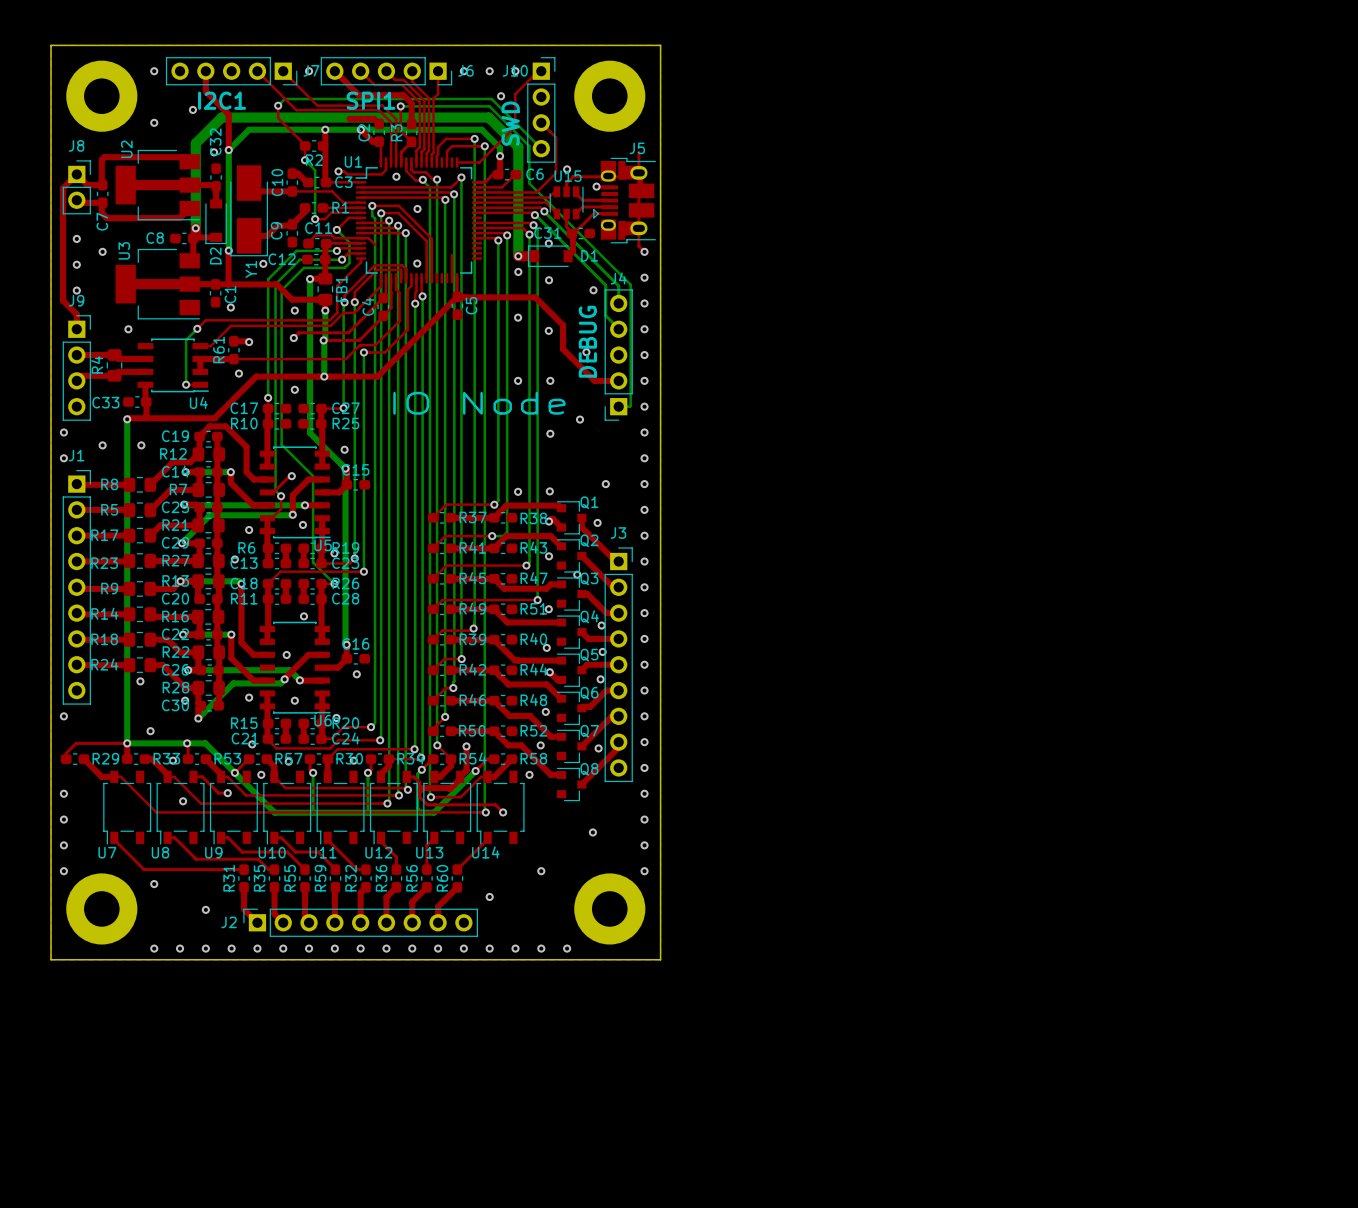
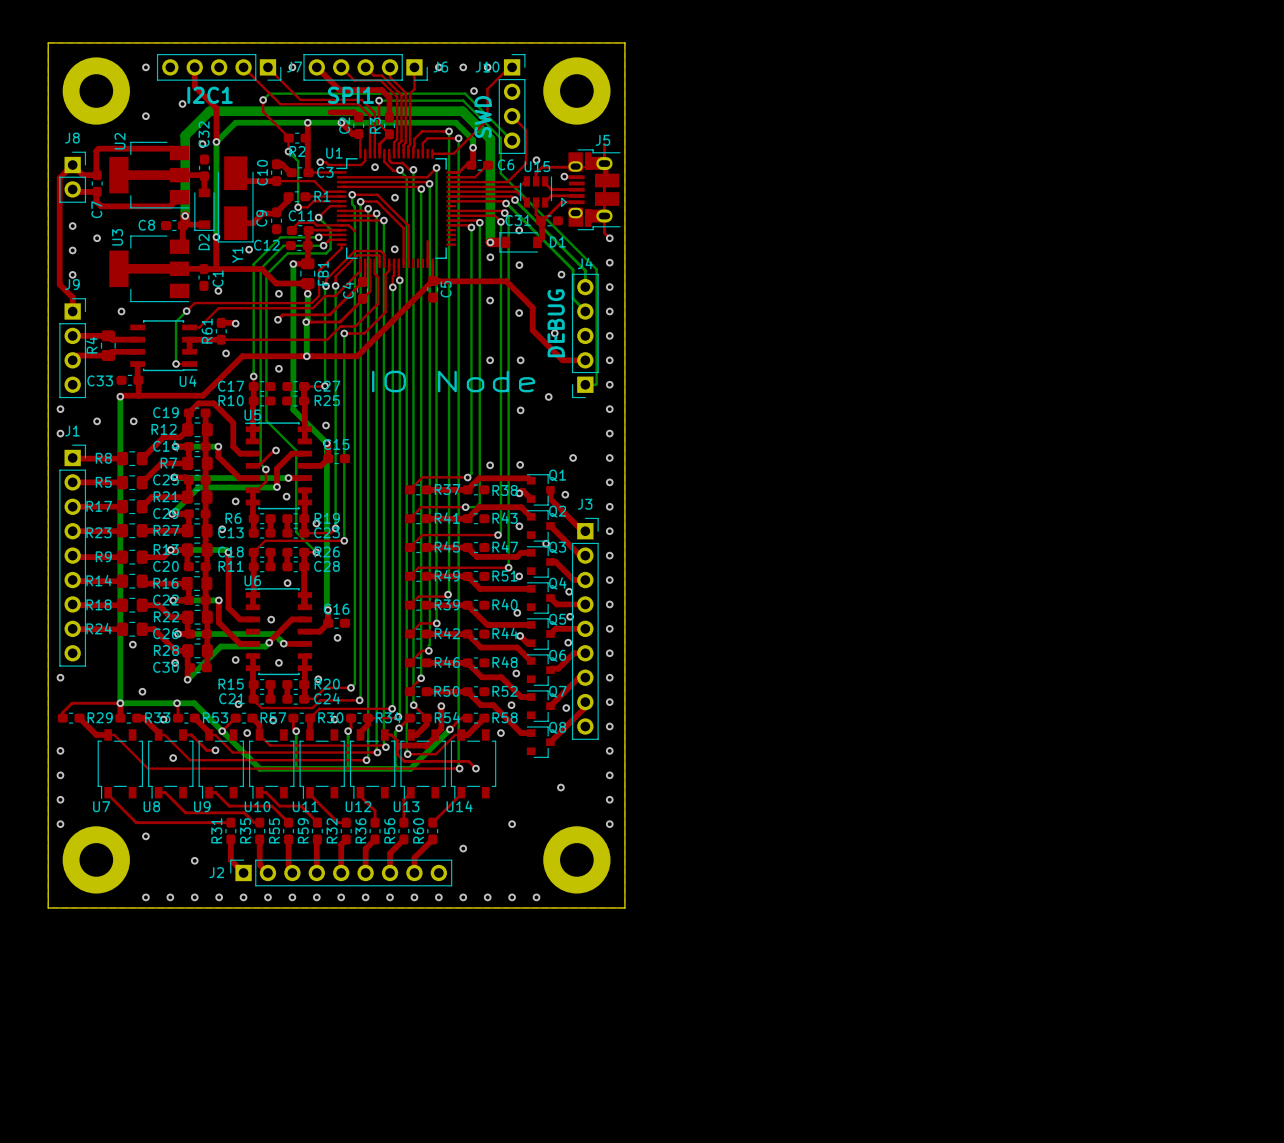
U5 rotation: 0° (295, 492) -> 180° (278, 465)
U6 rotation: 0° (295, 667) -> 180° (278, 631)

